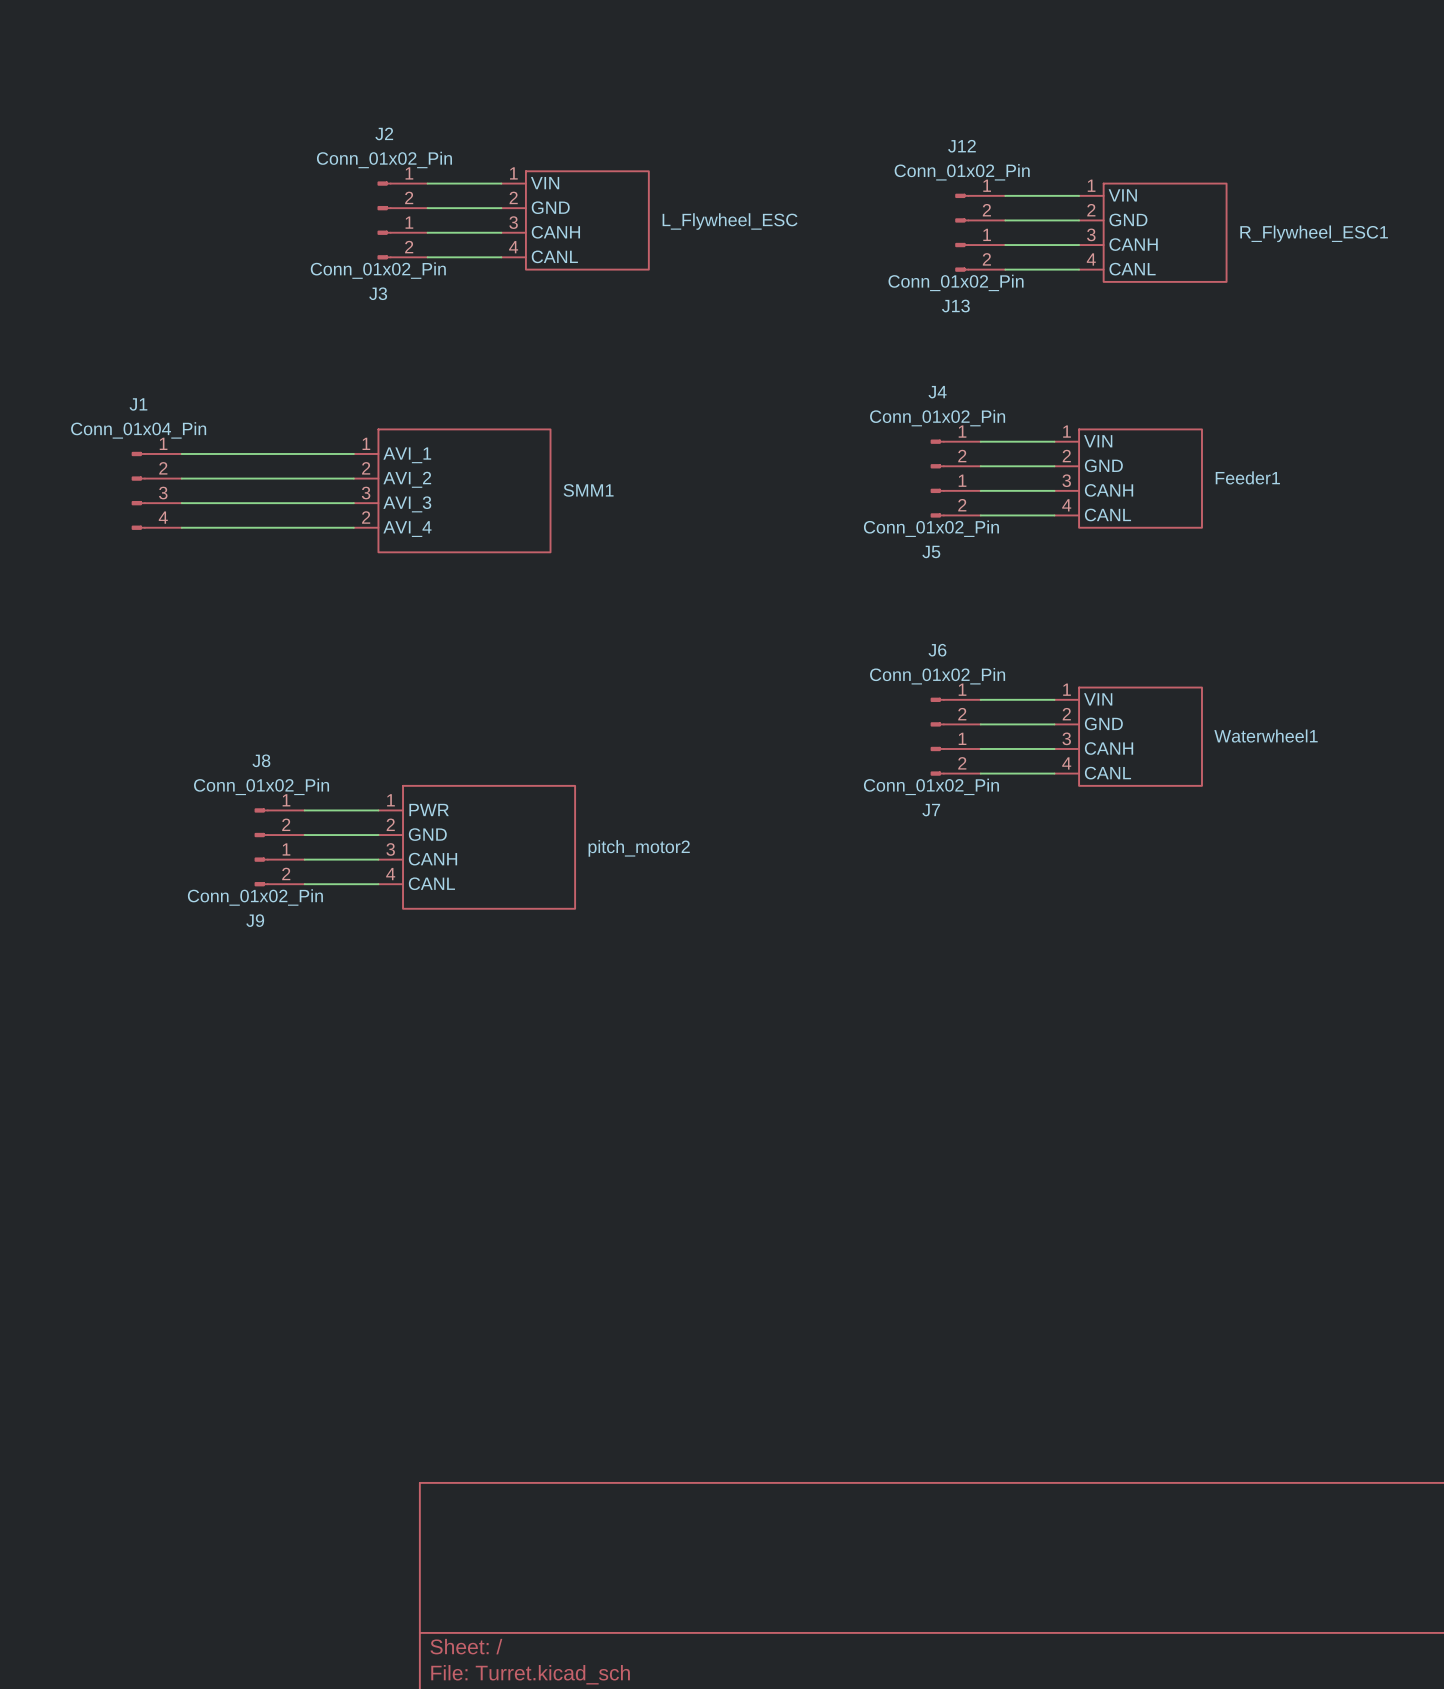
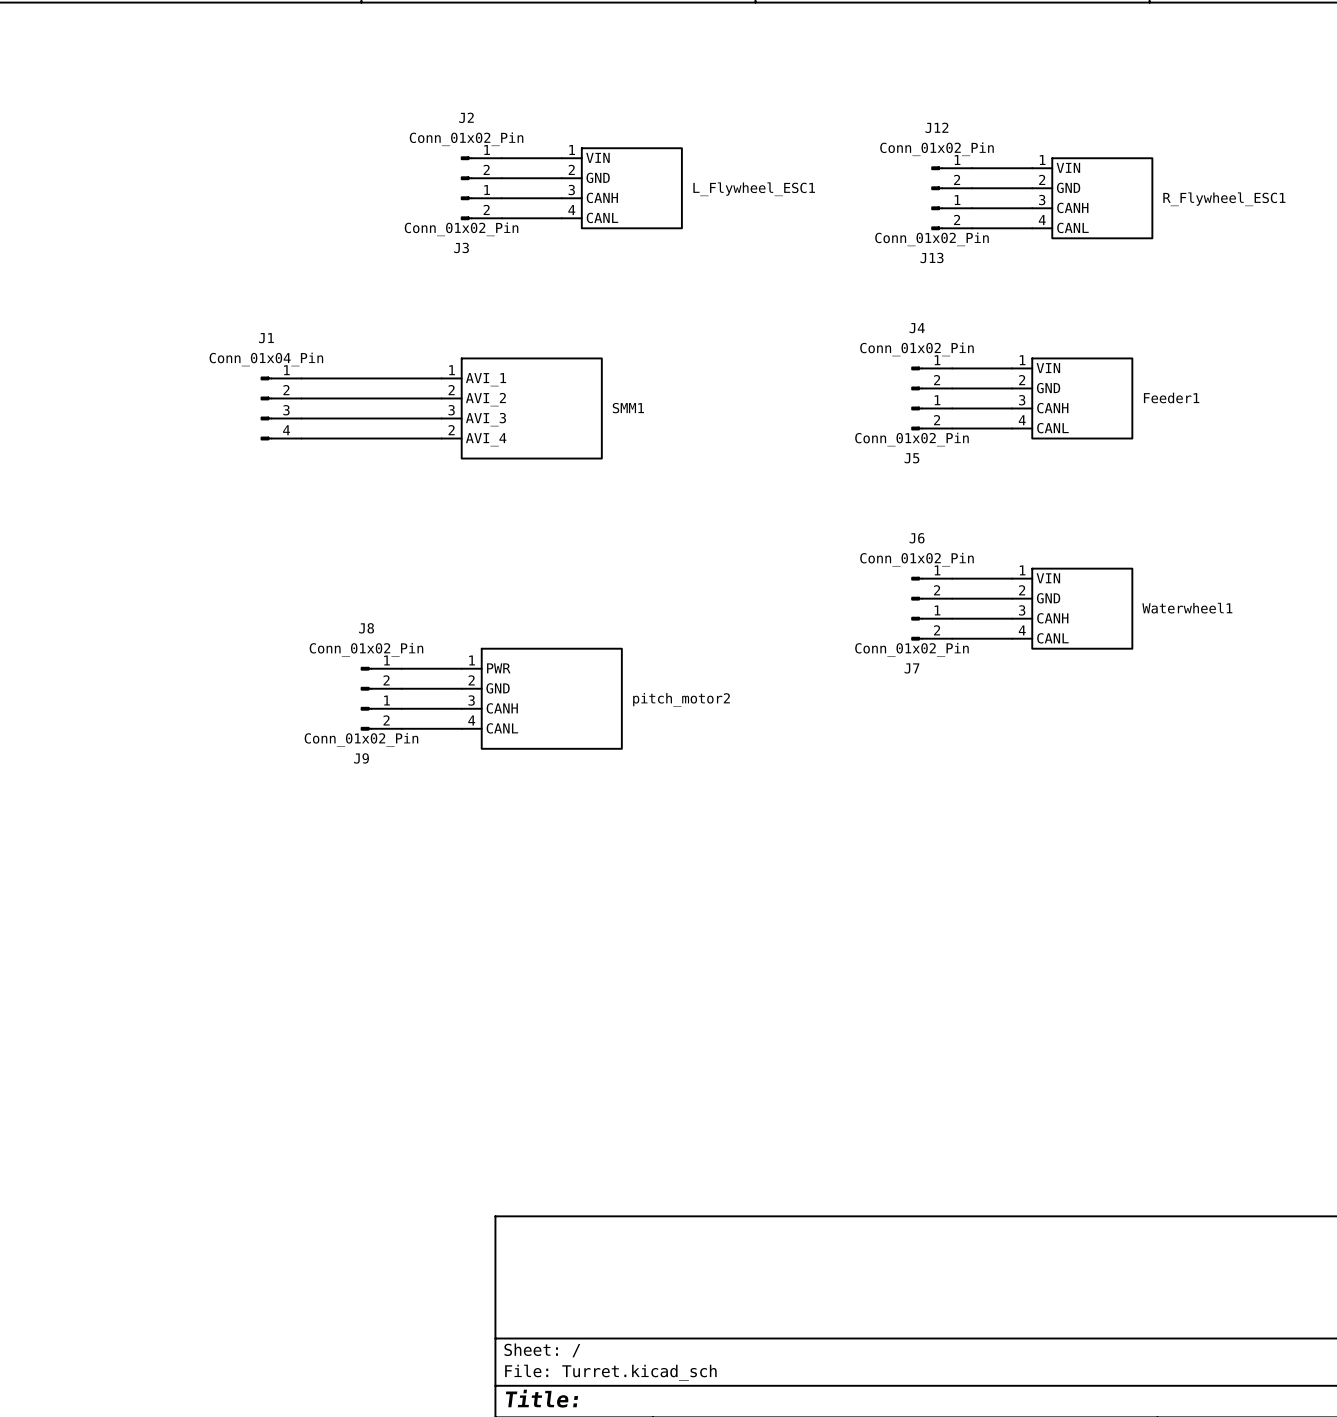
L_Flywheel_ESC name: L_Flywheel_ESC (730, 221) -> L_Flywheel_ESC1 (754, 189)

